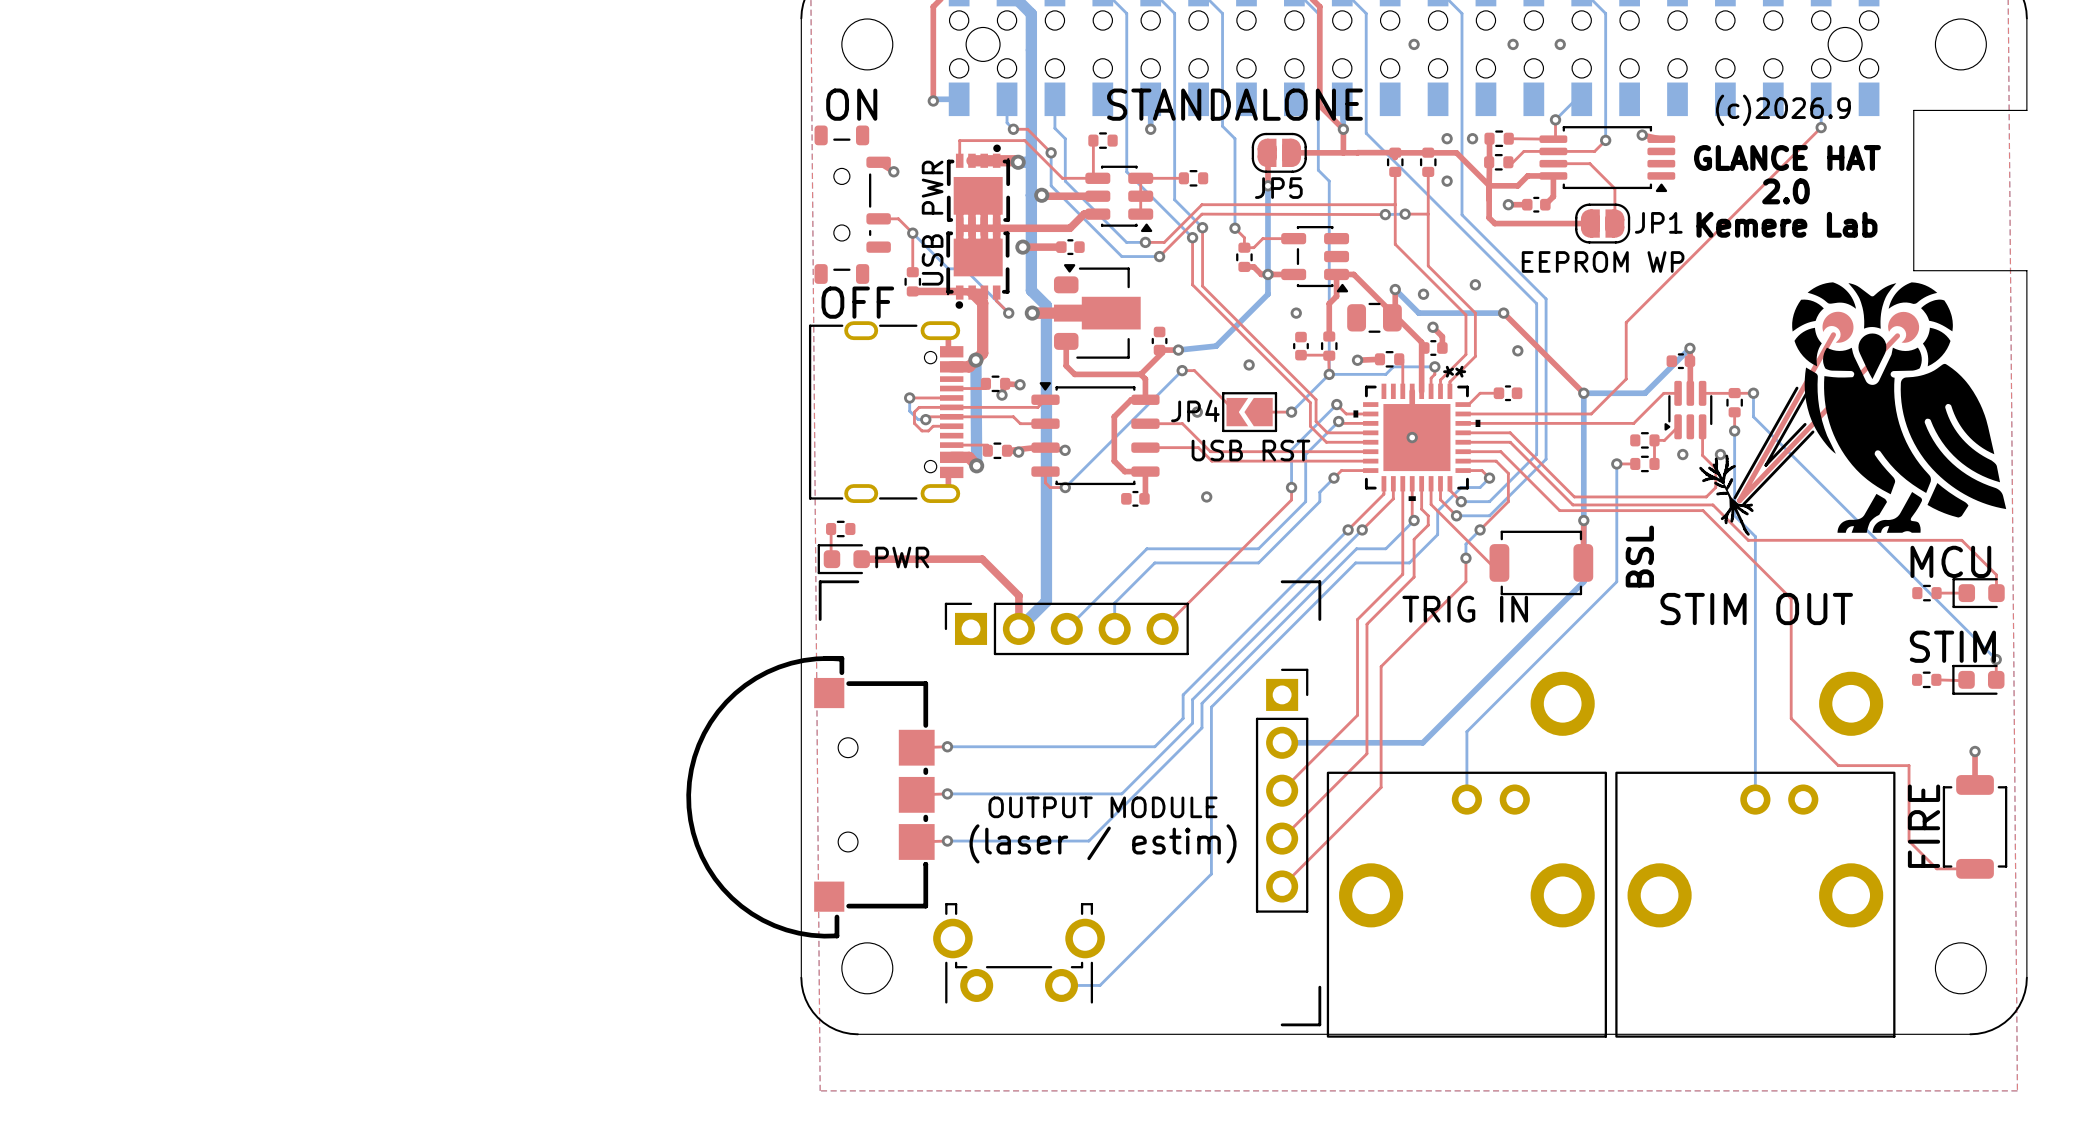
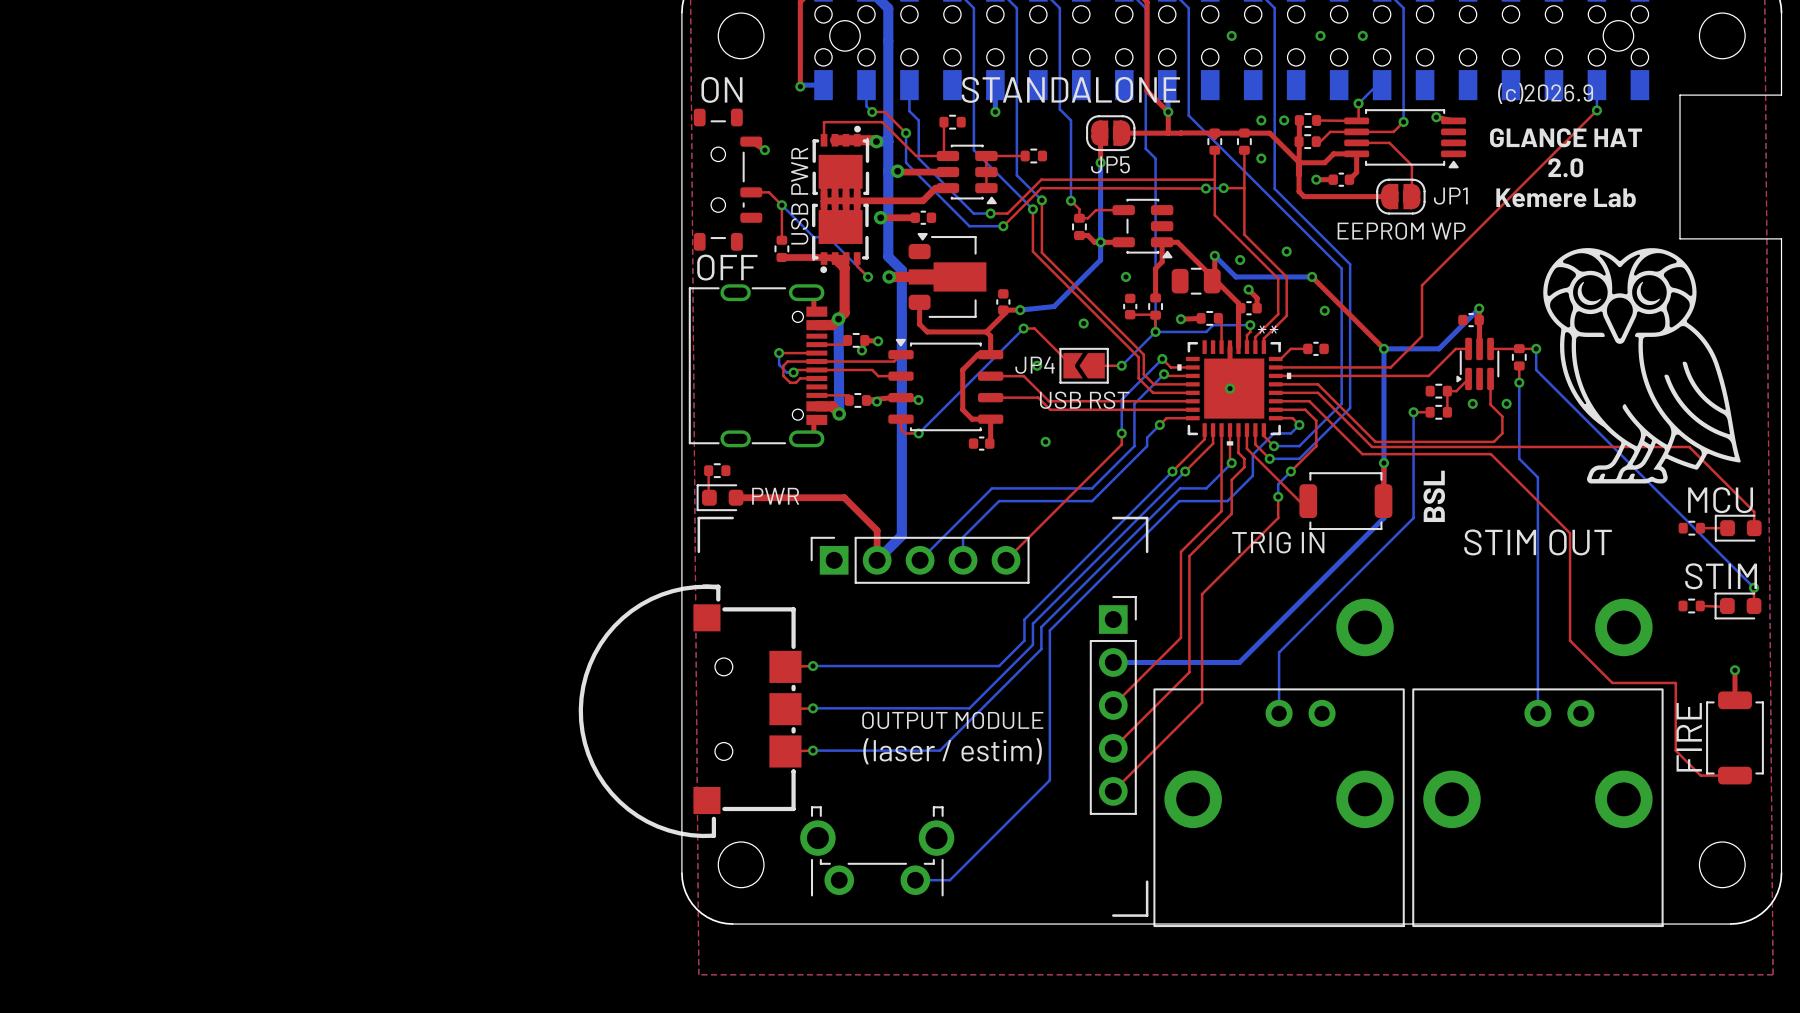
drawing: none -> [1543, 248, 1741, 484]
drawing: [1699, 282, 2007, 536] -> none
top track: (1570, 502) (1572, 504) (1712, 504) (1748, 540) (1961, 540) -> (1372, 446) (1689, 446) (1723, 480)

